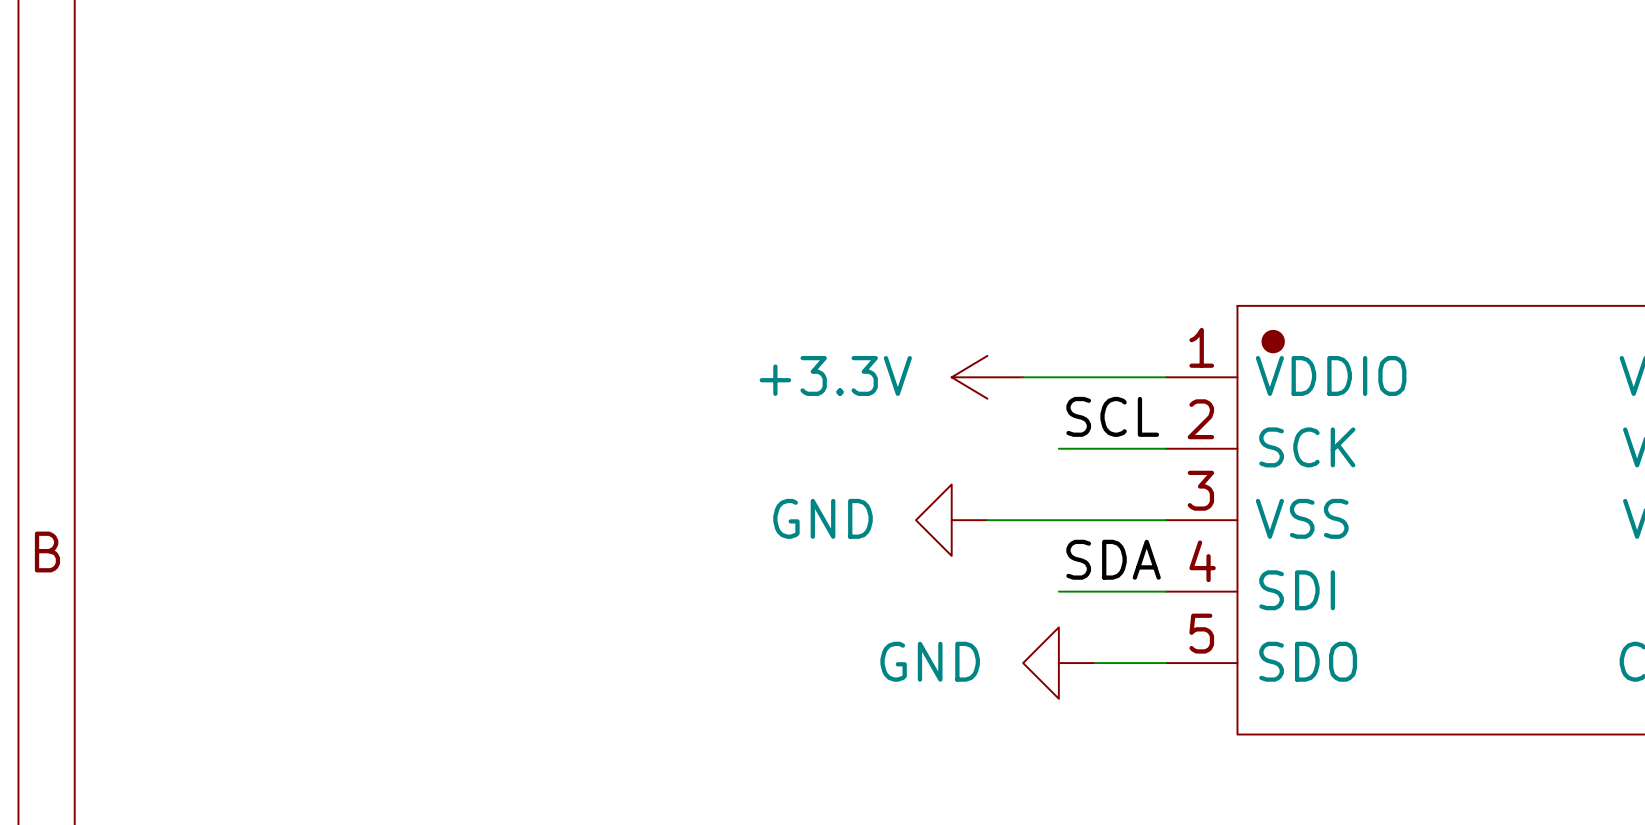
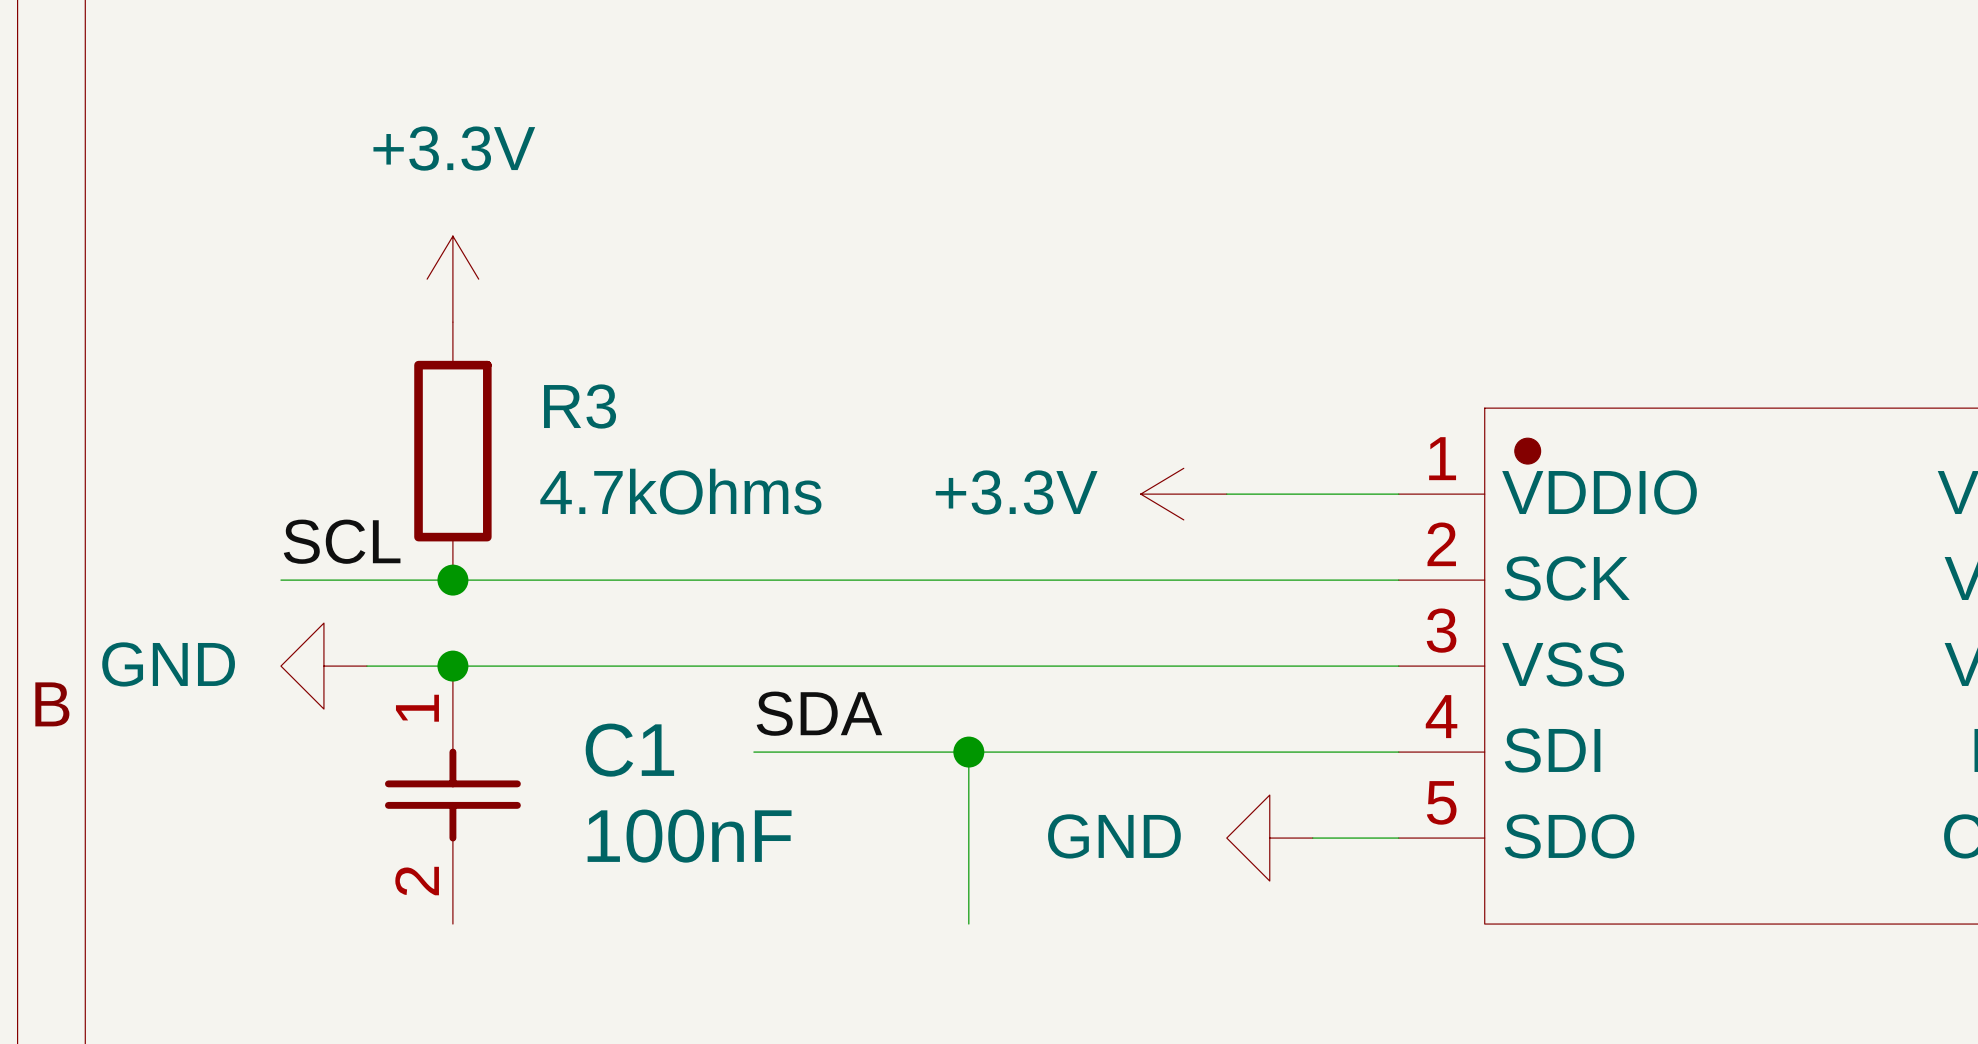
power symbol: none -> +3.3V (452, 279)
R3: none -> 4.7kOhms (452, 451)
label: none -> SCL (342, 541)
label: SCL (1112, 416) -> none
wire: none -> (280, 580) (1269, 580)
junction: none -> (452, 580)
wire: none -> (366, 666) (1183, 666)
junction: none -> (452, 666)
power symbol position: GND (951, 520) -> GND (323, 666)
label position: SDA (1113, 559) -> SDA (819, 713)
wire: none -> (753, 752) (1269, 752)
wire: none -> (968, 752) (968, 924)
junction: none -> (968, 752)
C1: none -> 100nF (452, 795)

